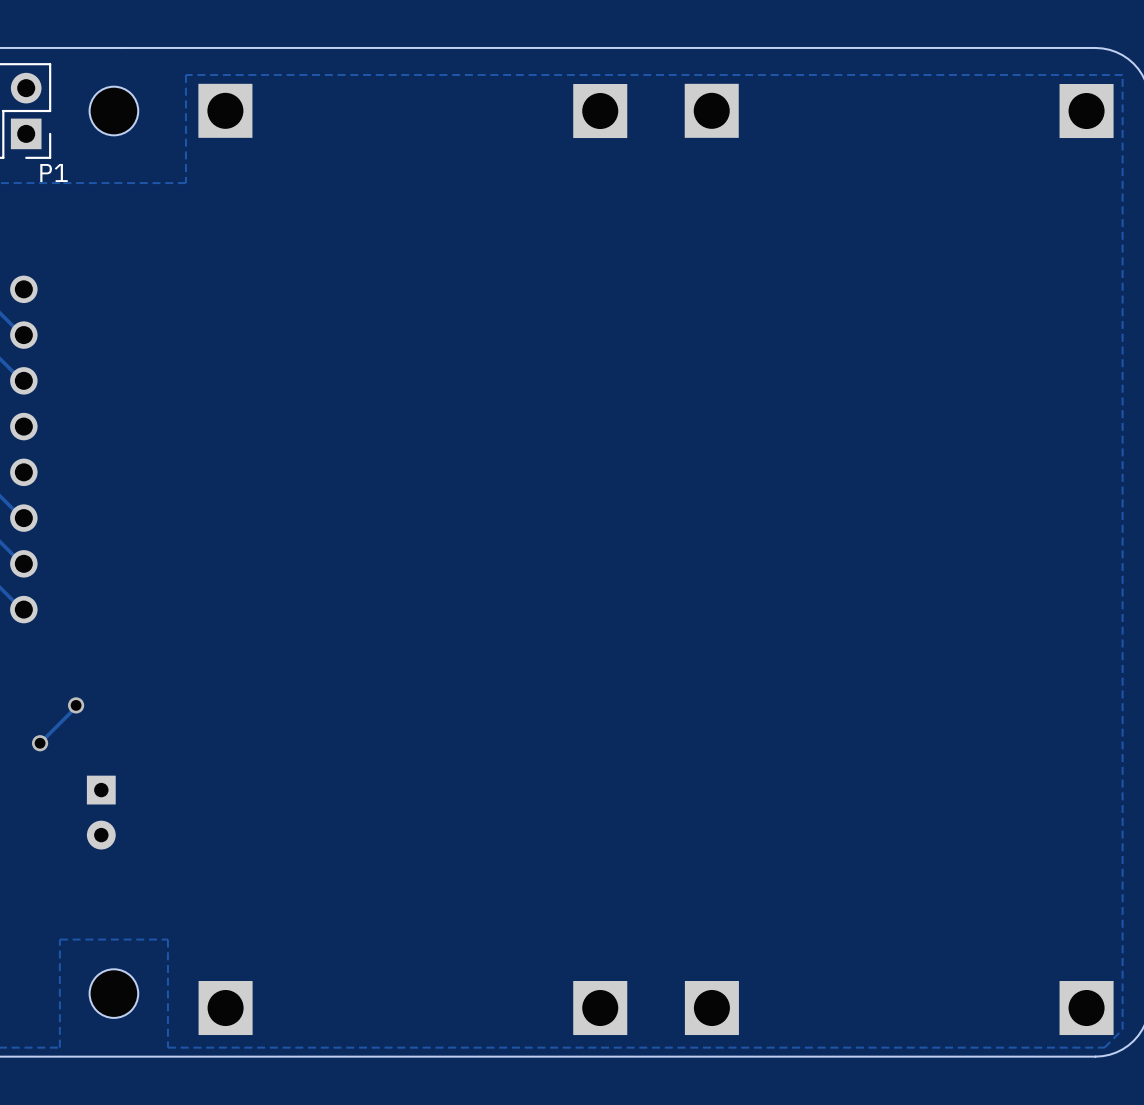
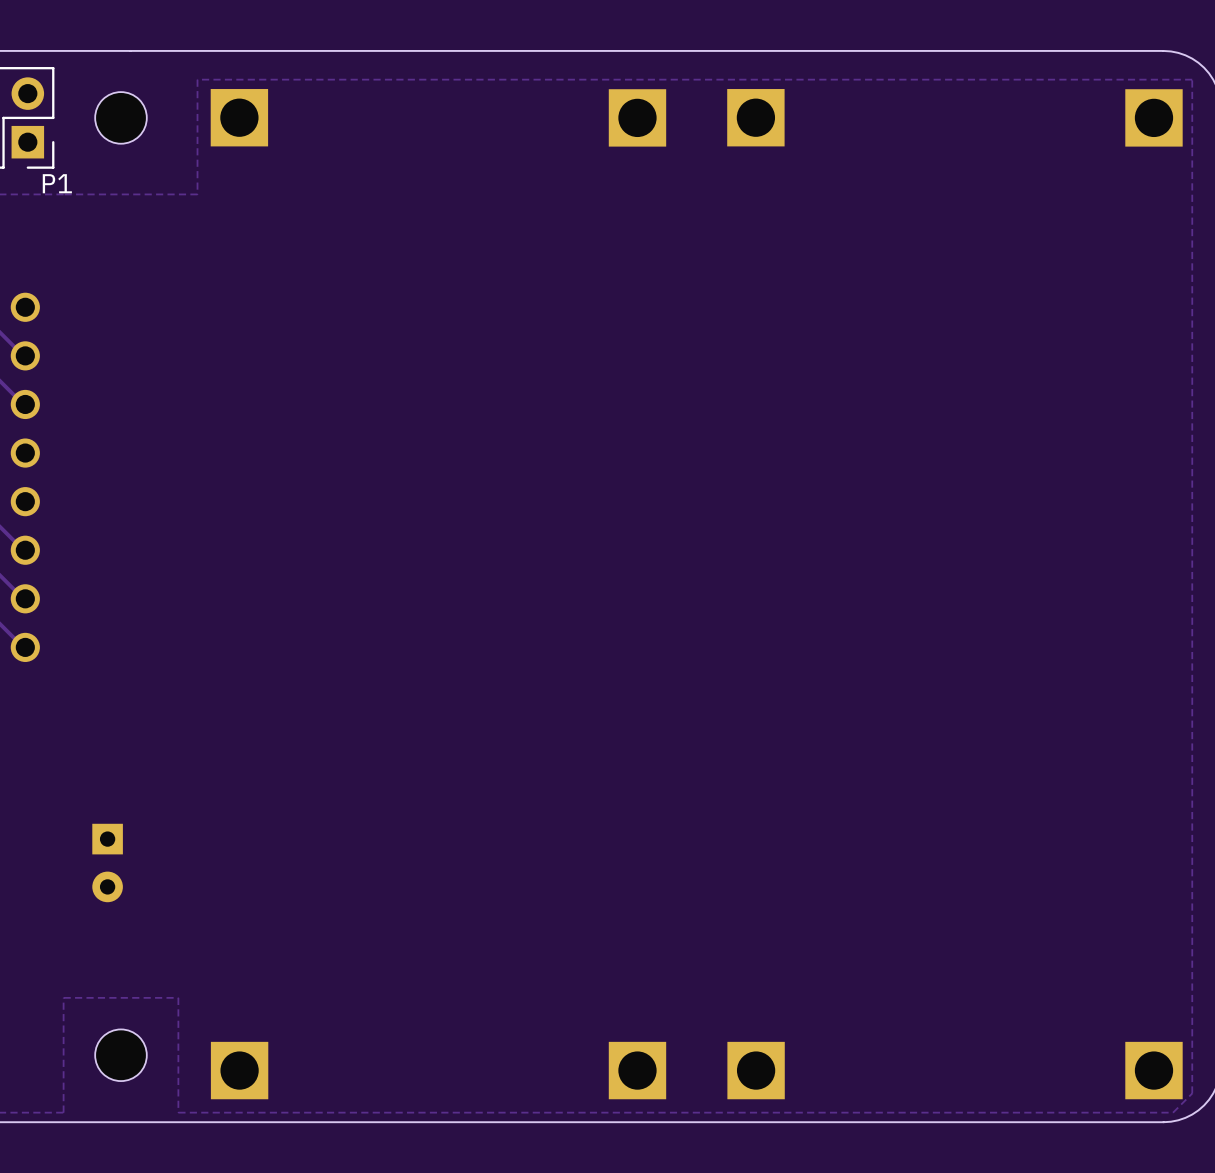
track: (76, 705) (40, 743) -> none
via: (76, 705) -> none
via: (40, 743) -> none

